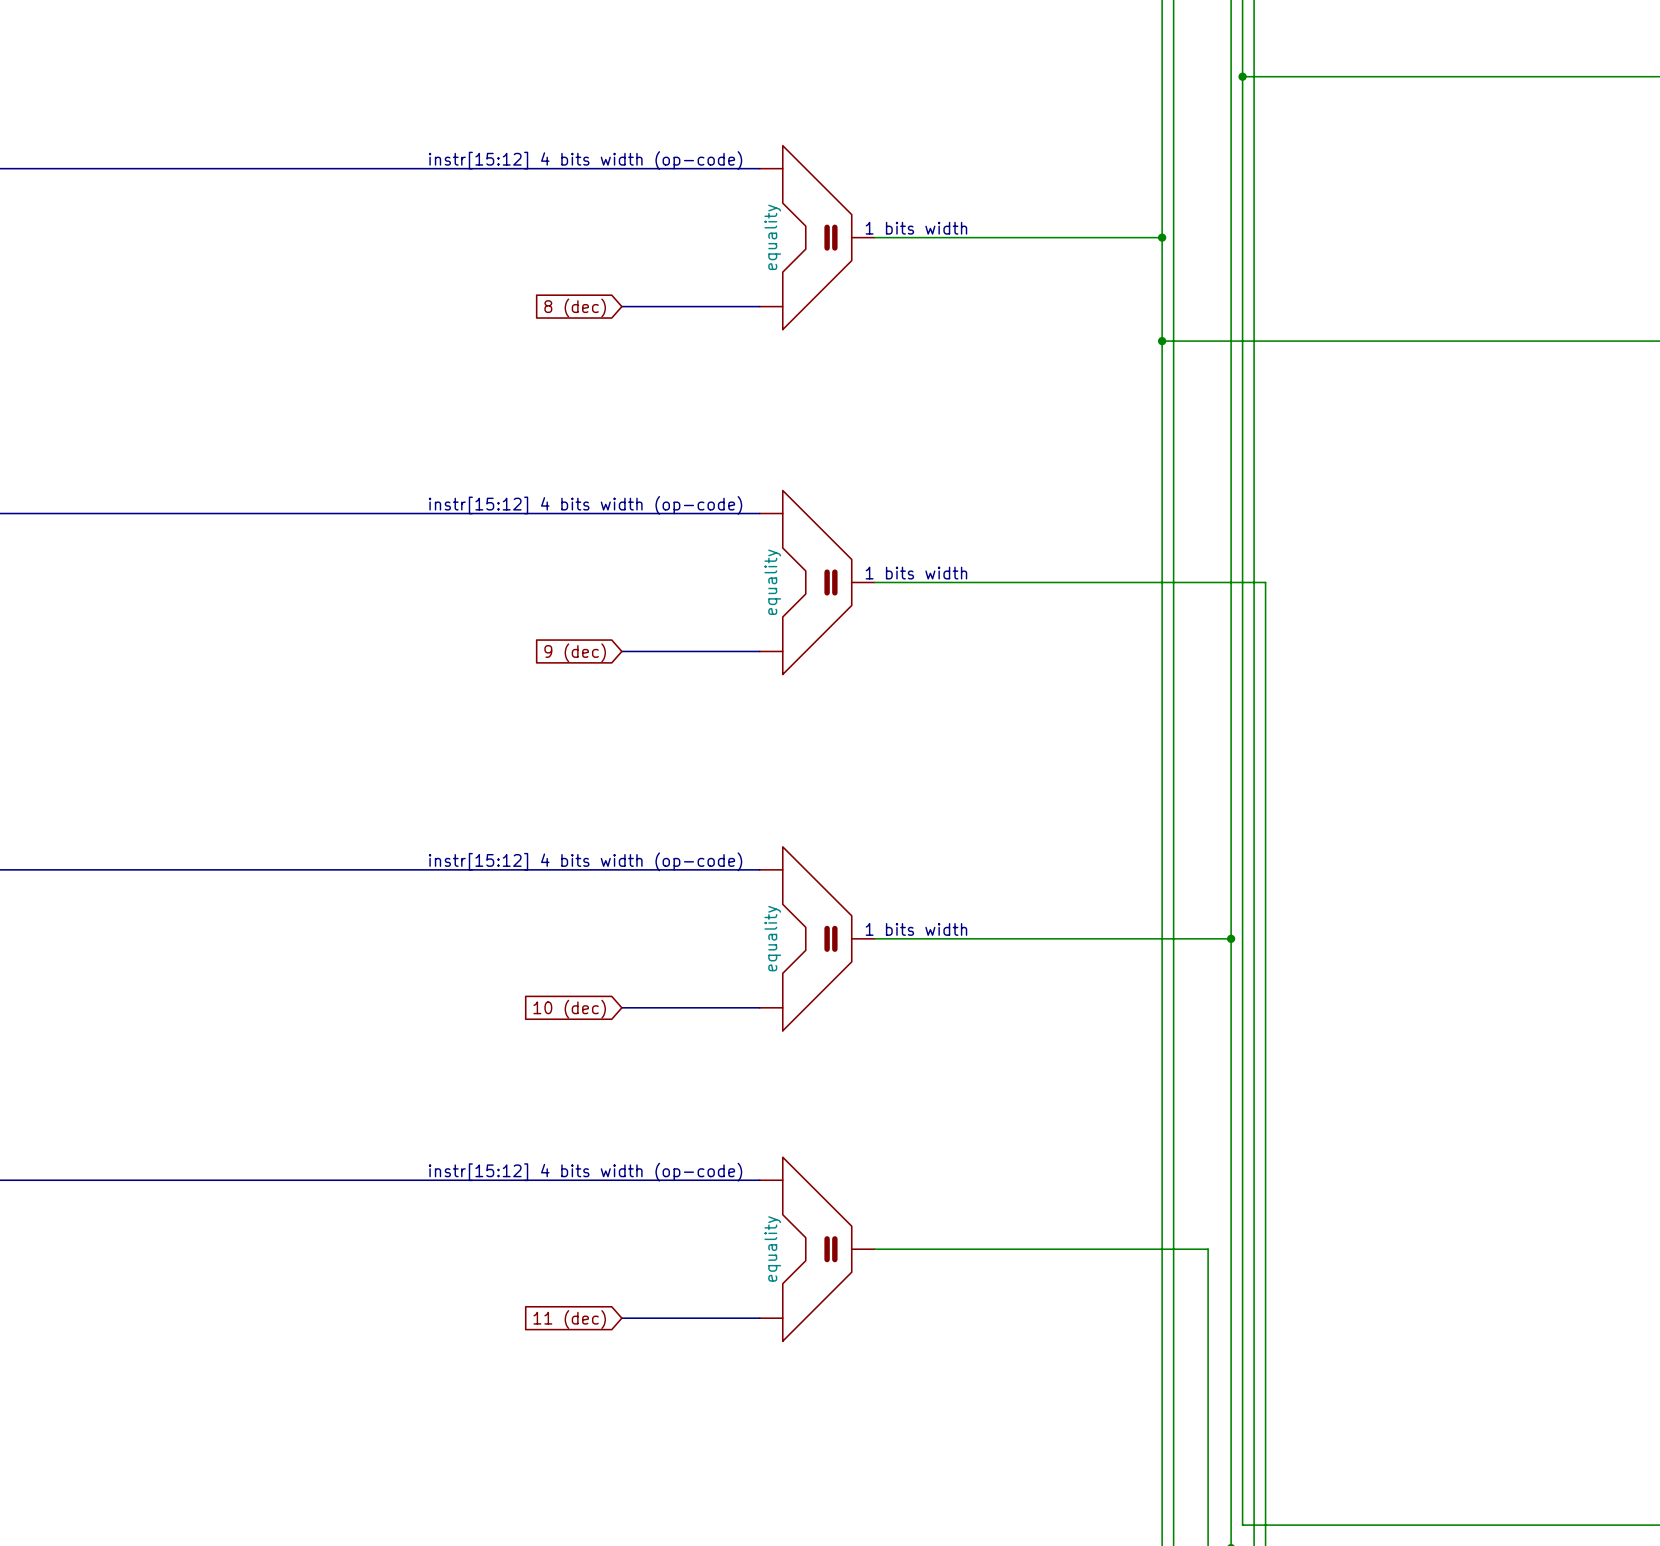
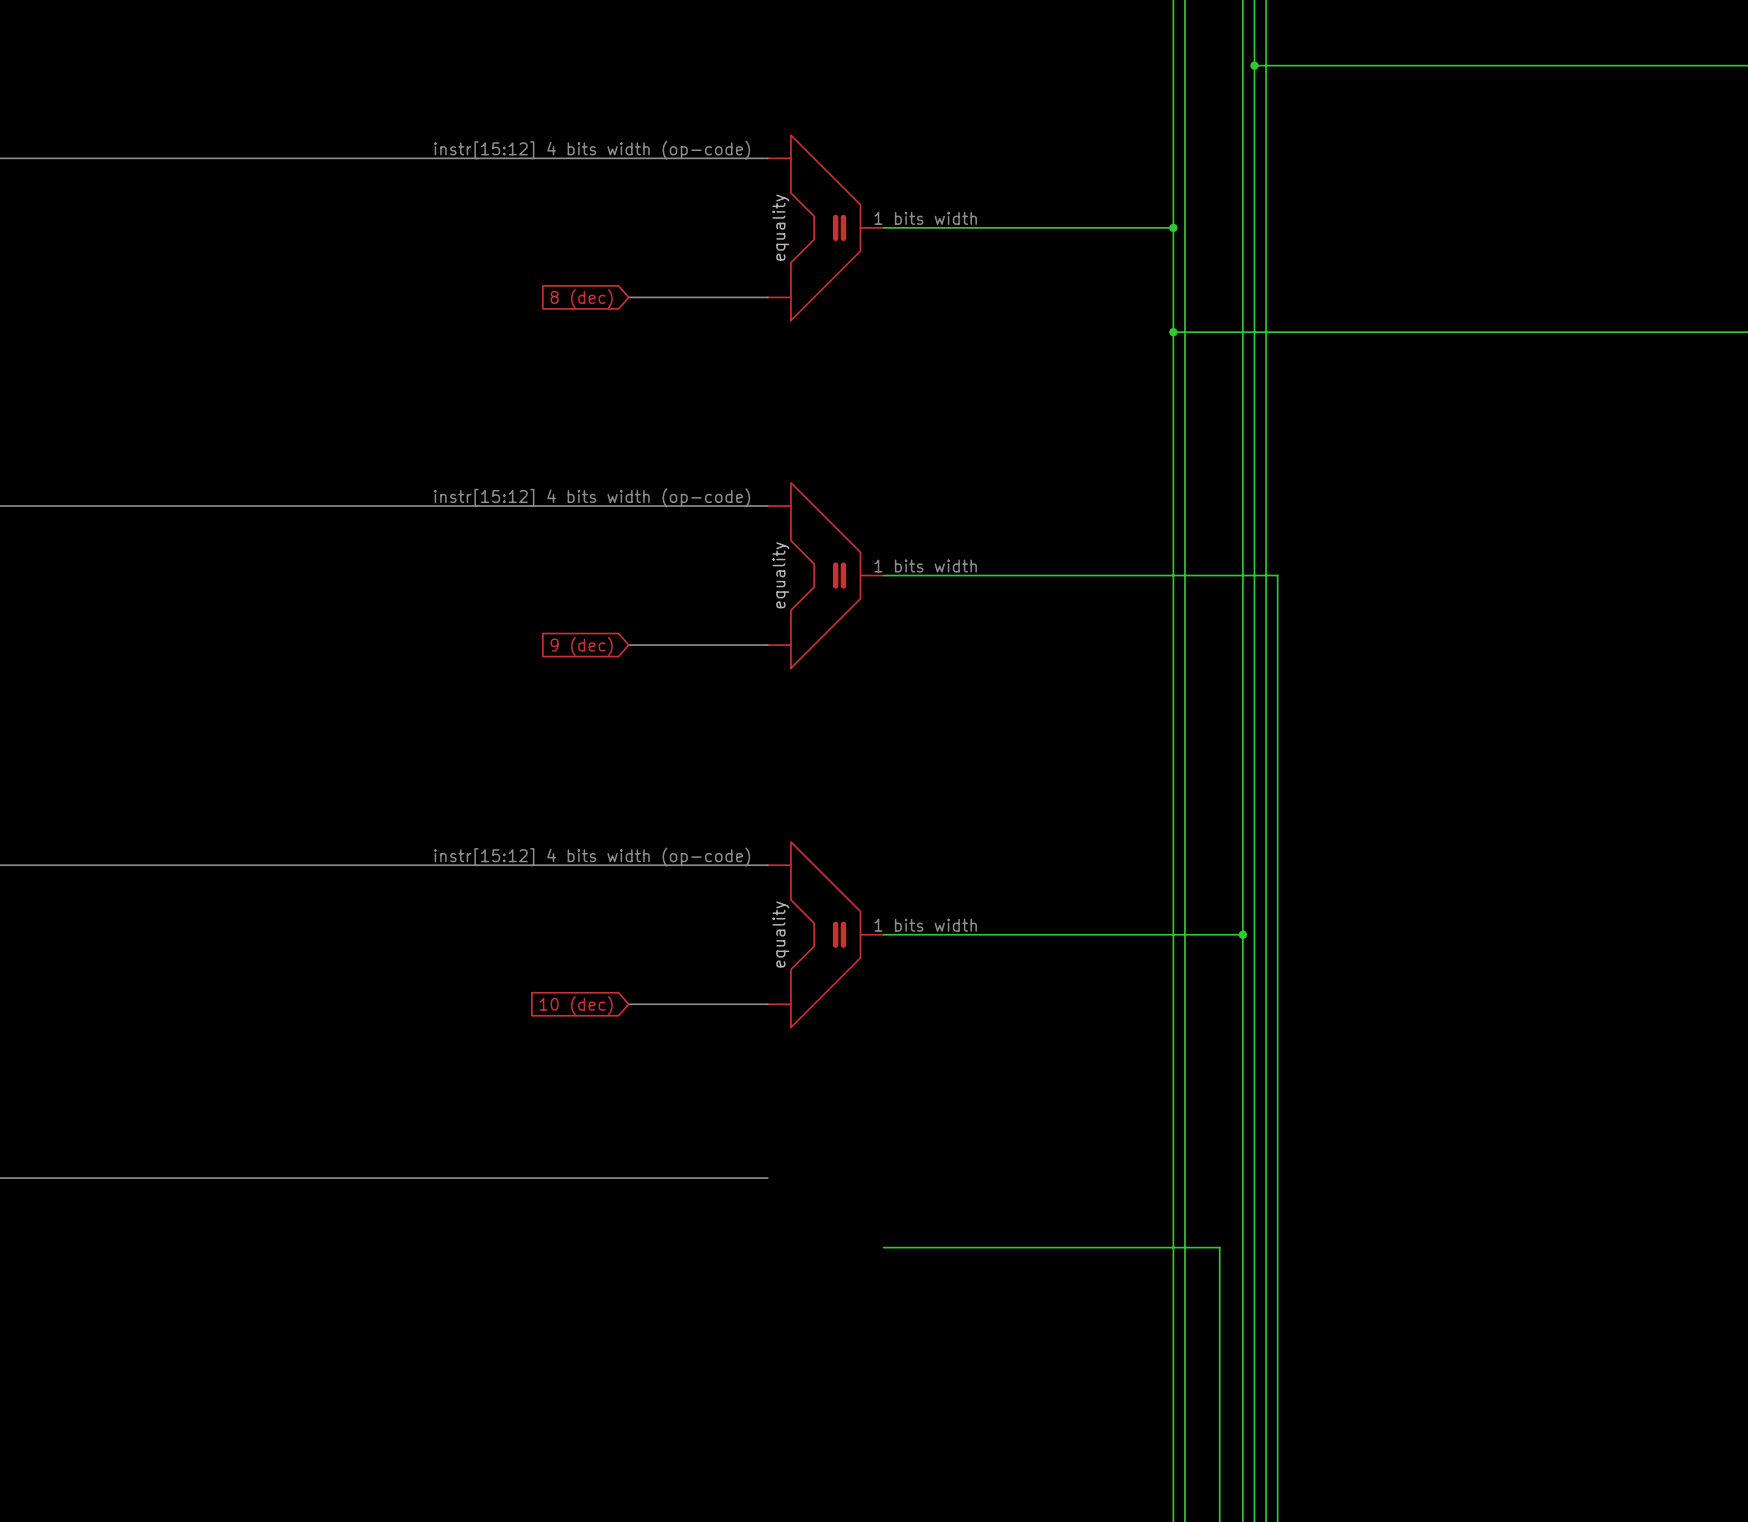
text: instr[15:12] 4 bits width (op-code) (585, 1172) -> none
part: equality (817, 1249) -> none
bus: (621, 1318) (759, 1318) -> none
global label: 11 (dec) (569, 1319) -> none

